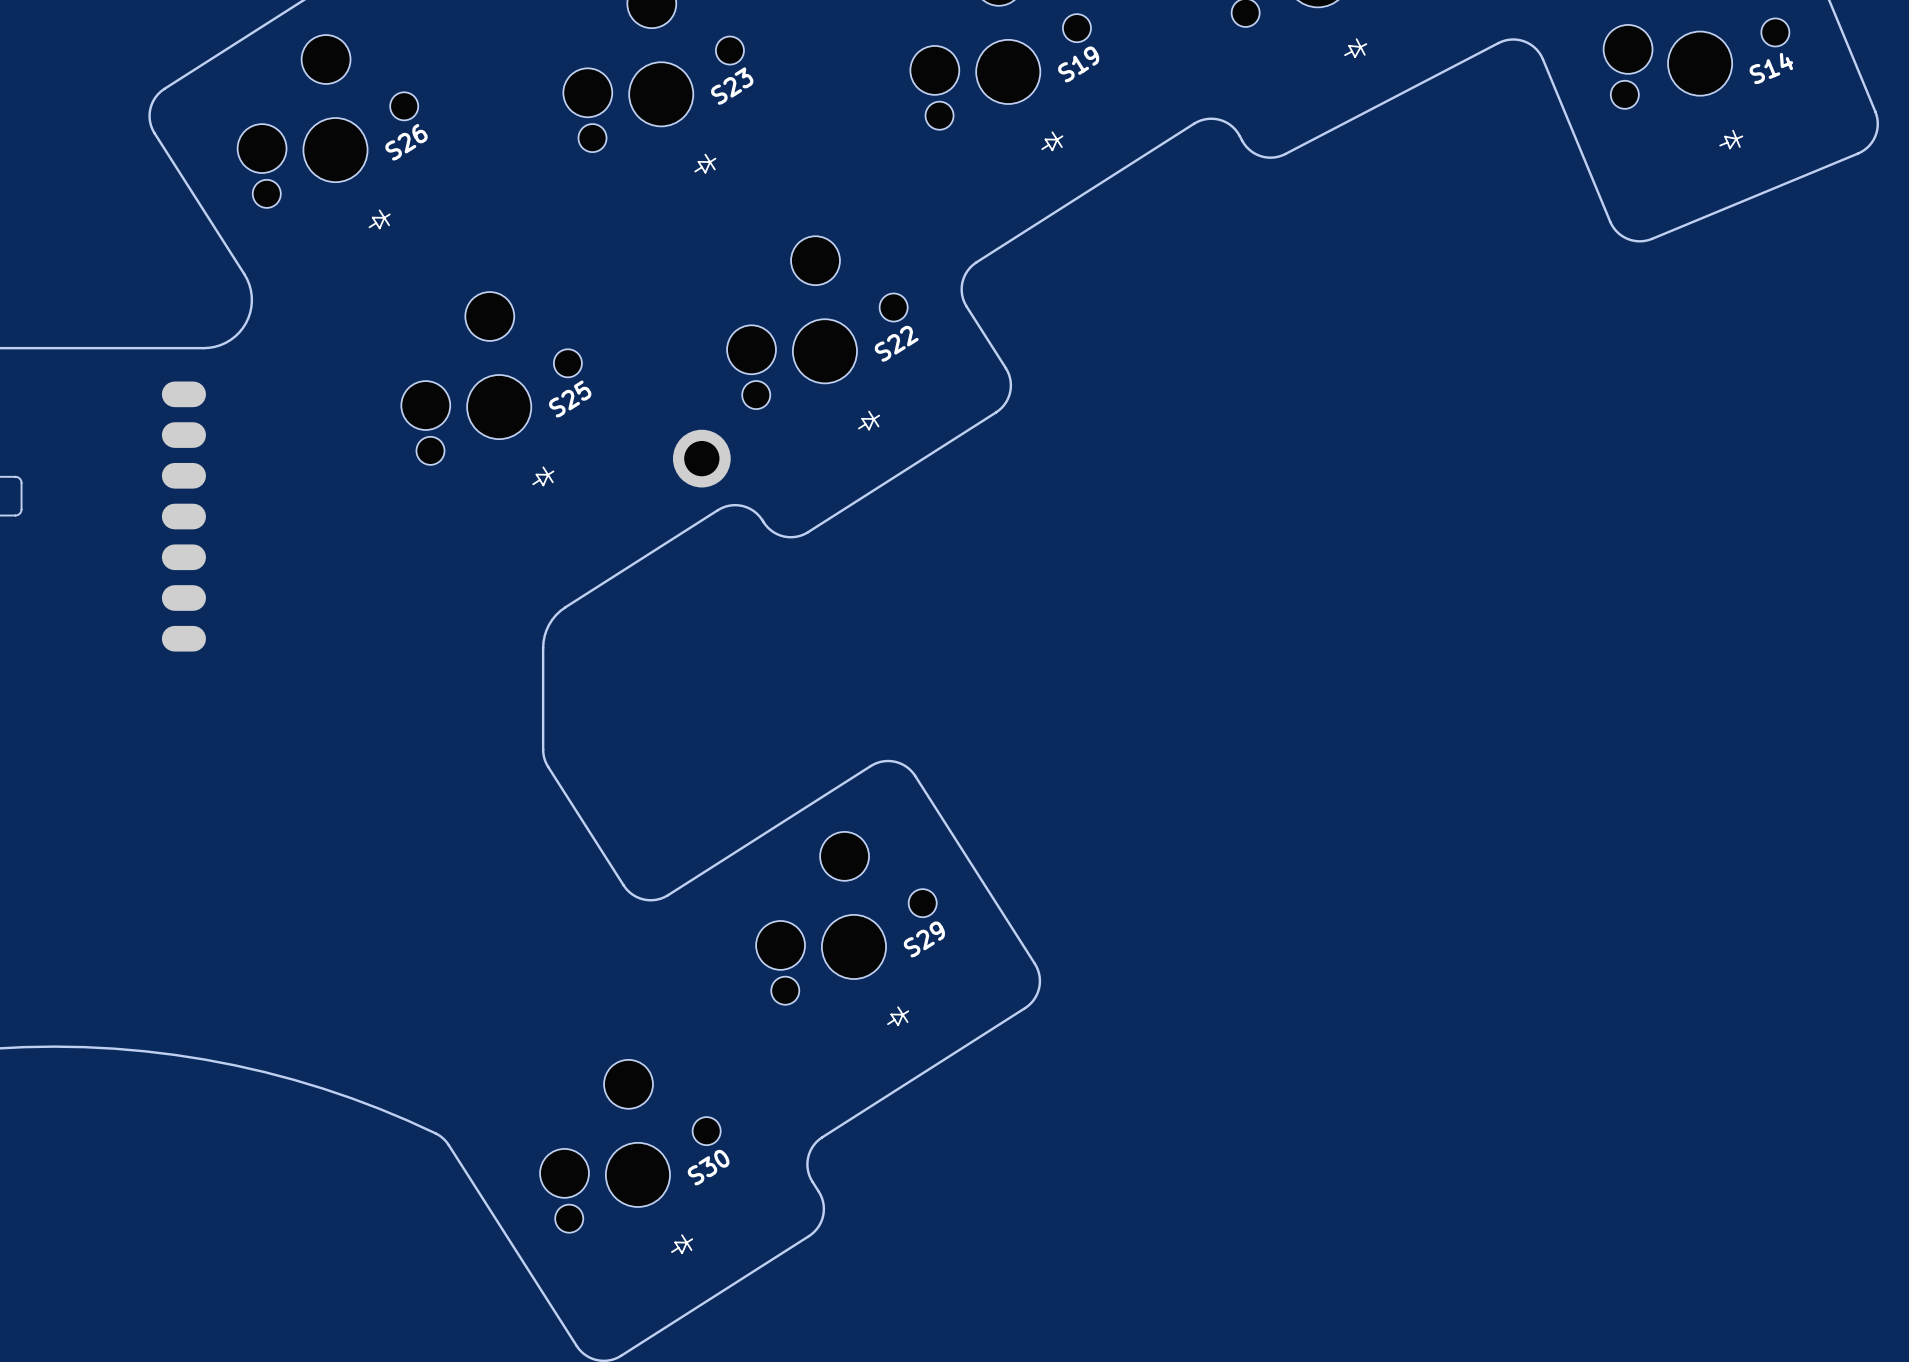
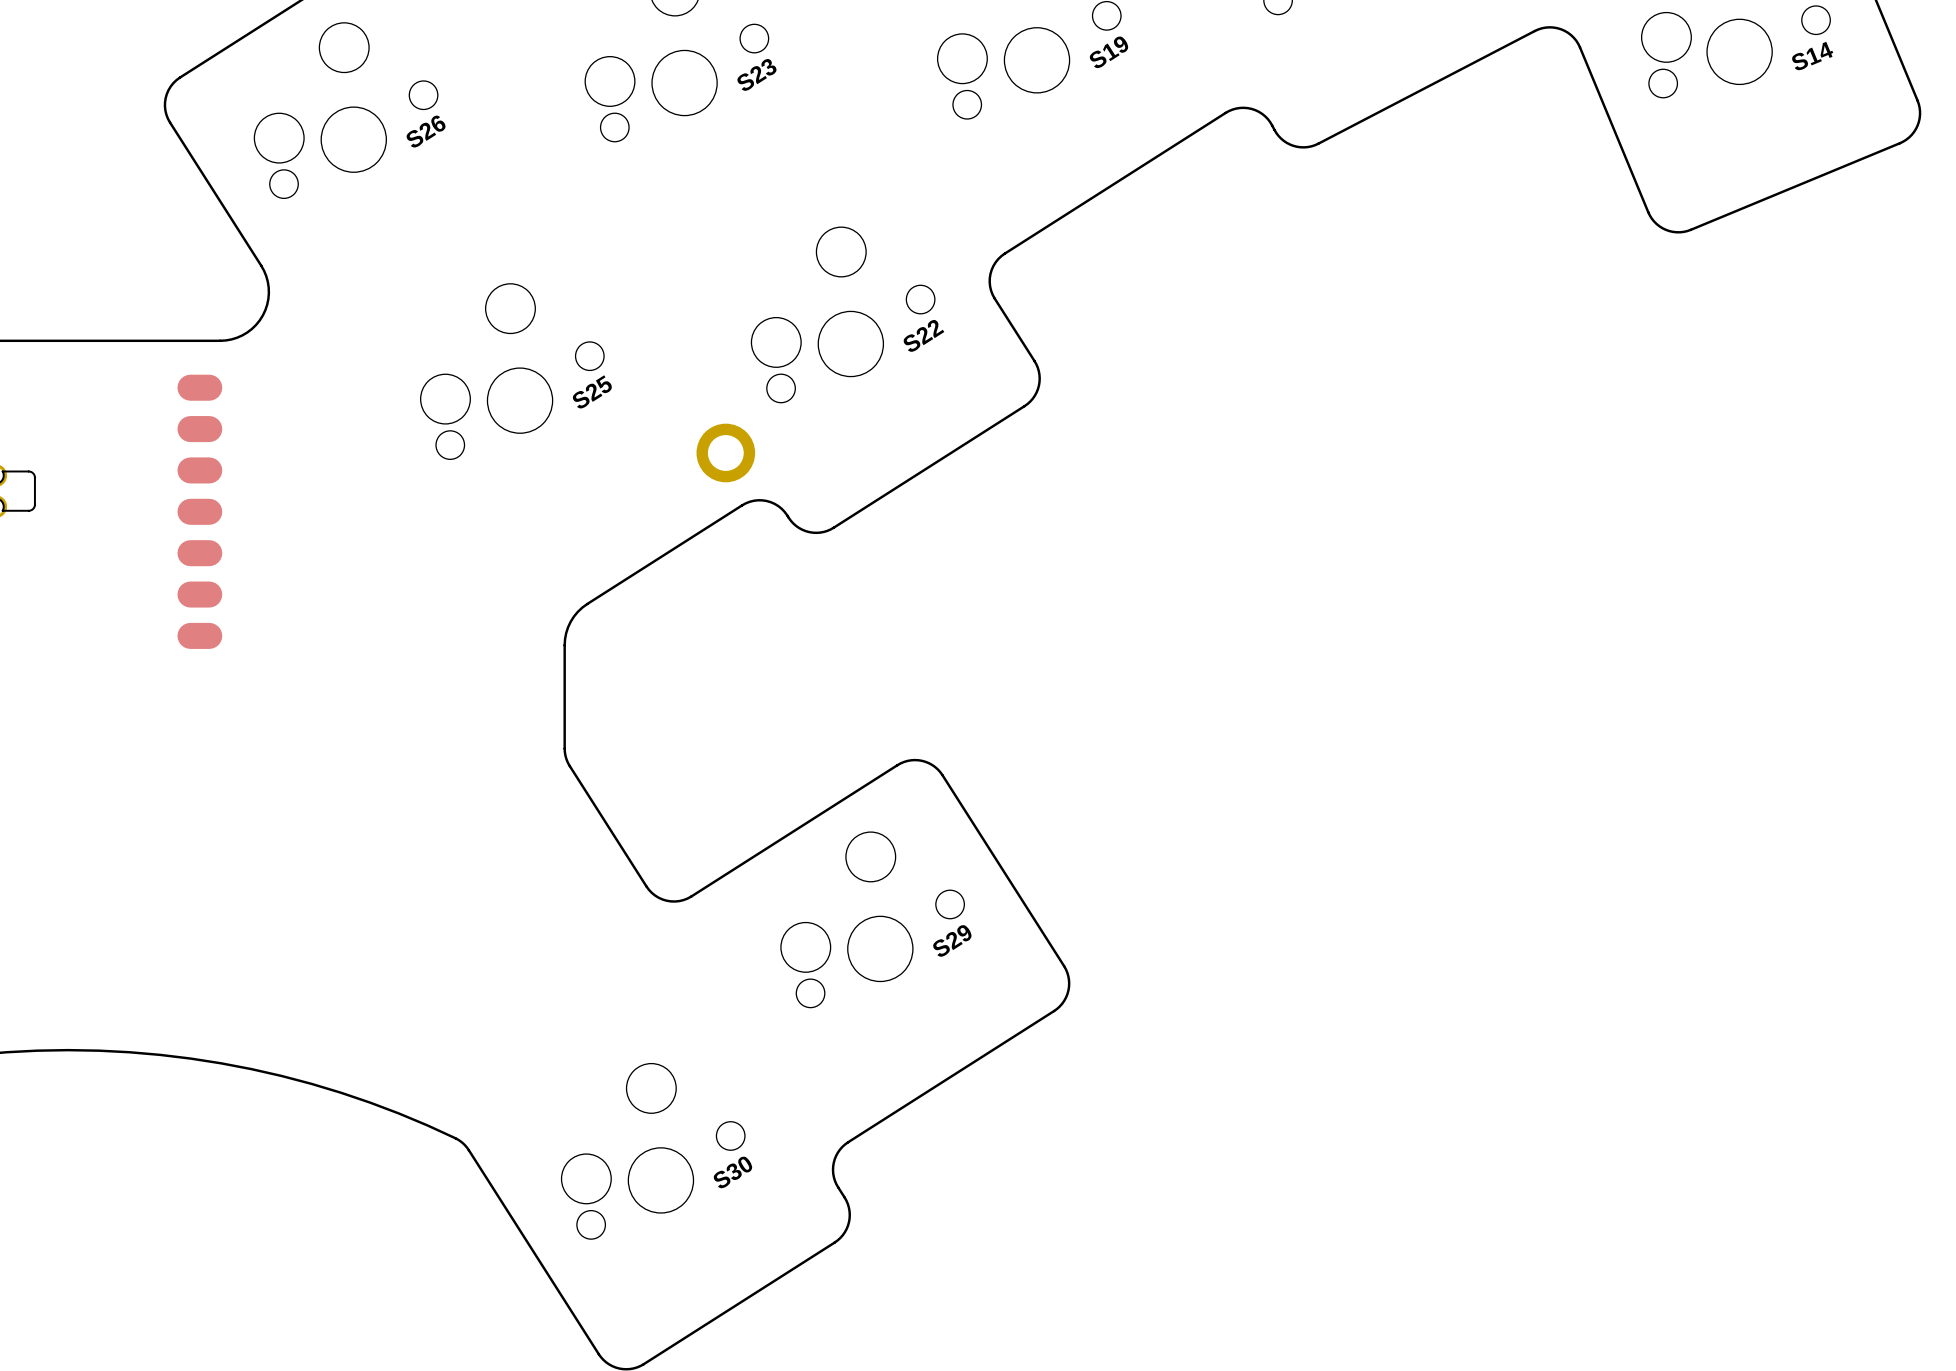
part: (1355, 48) -> none
part: (1731, 139) -> none
part: (1052, 141) -> none
part: (705, 163) -> none
part: (379, 219) -> none
part: (869, 420) -> none
part: (543, 476) -> none
part: (898, 1016) -> none
part: (682, 1244) -> none

